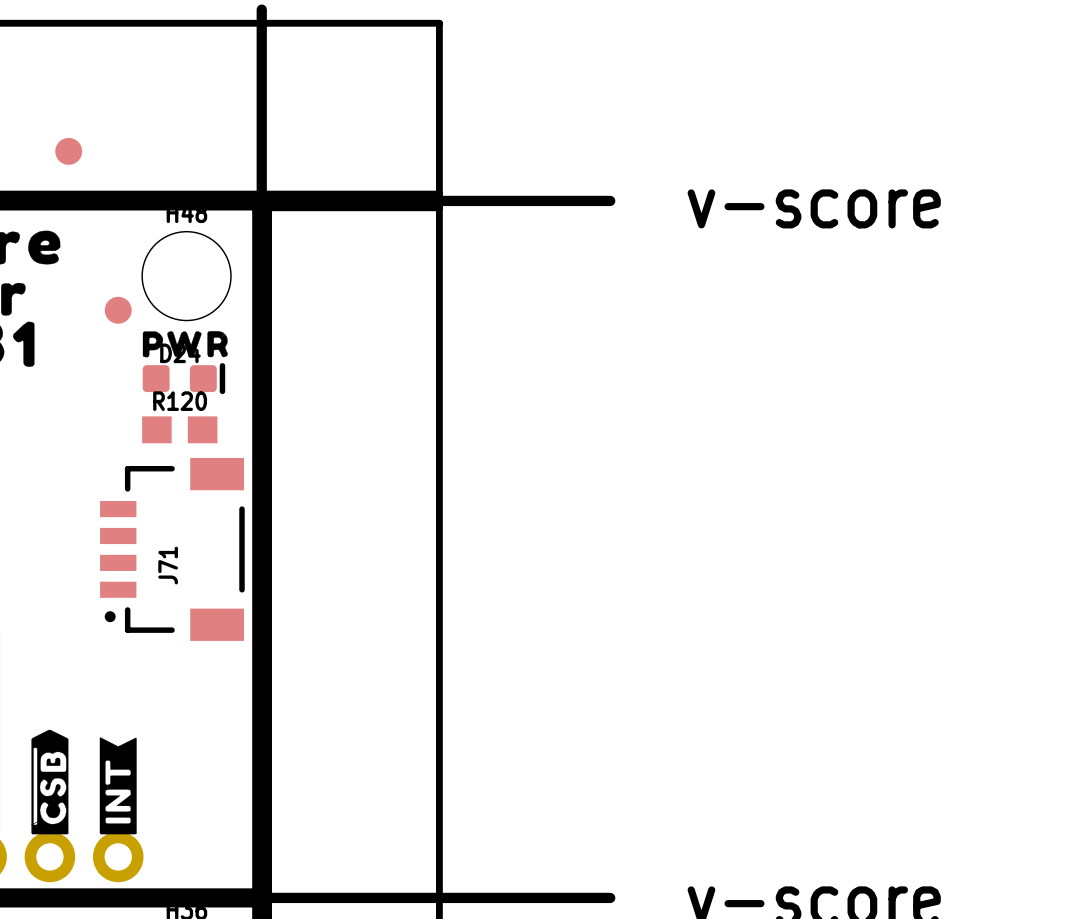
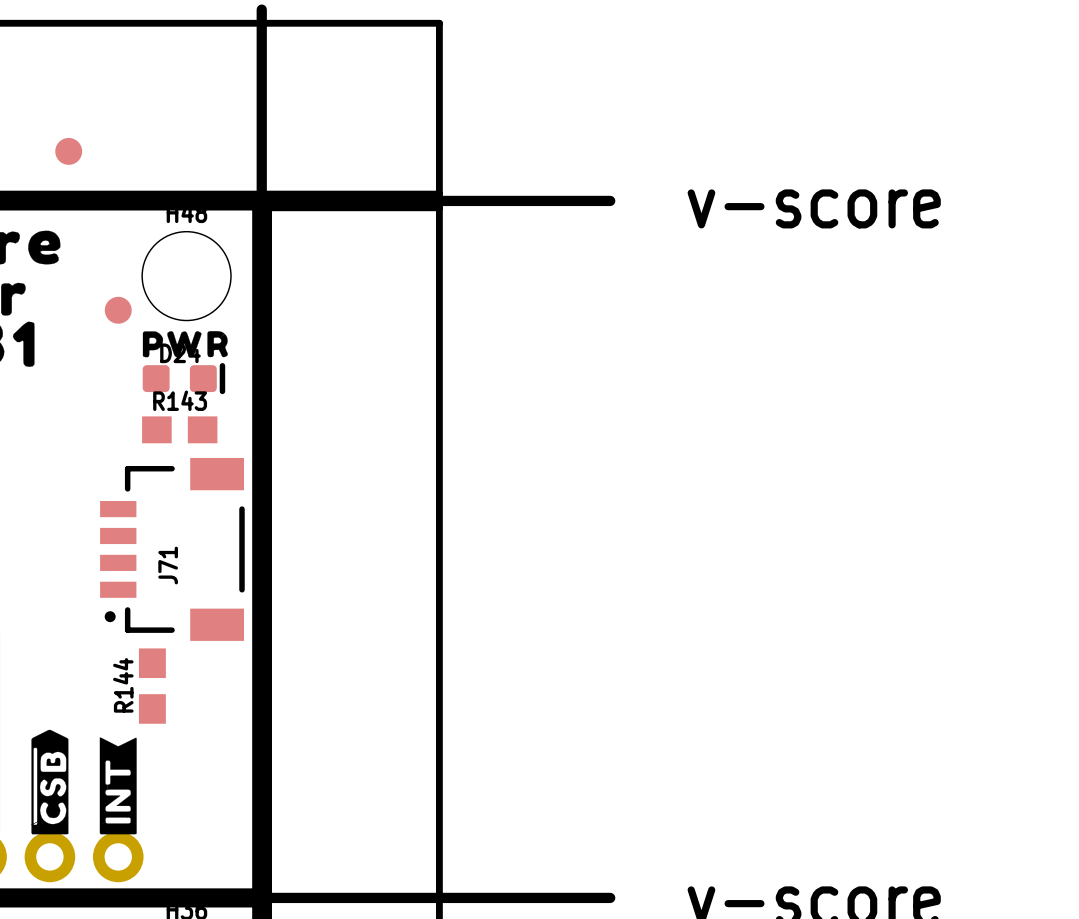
R120 name: R120 (180, 401) -> R143 (180, 400)
R144: none -> (152, 686)

